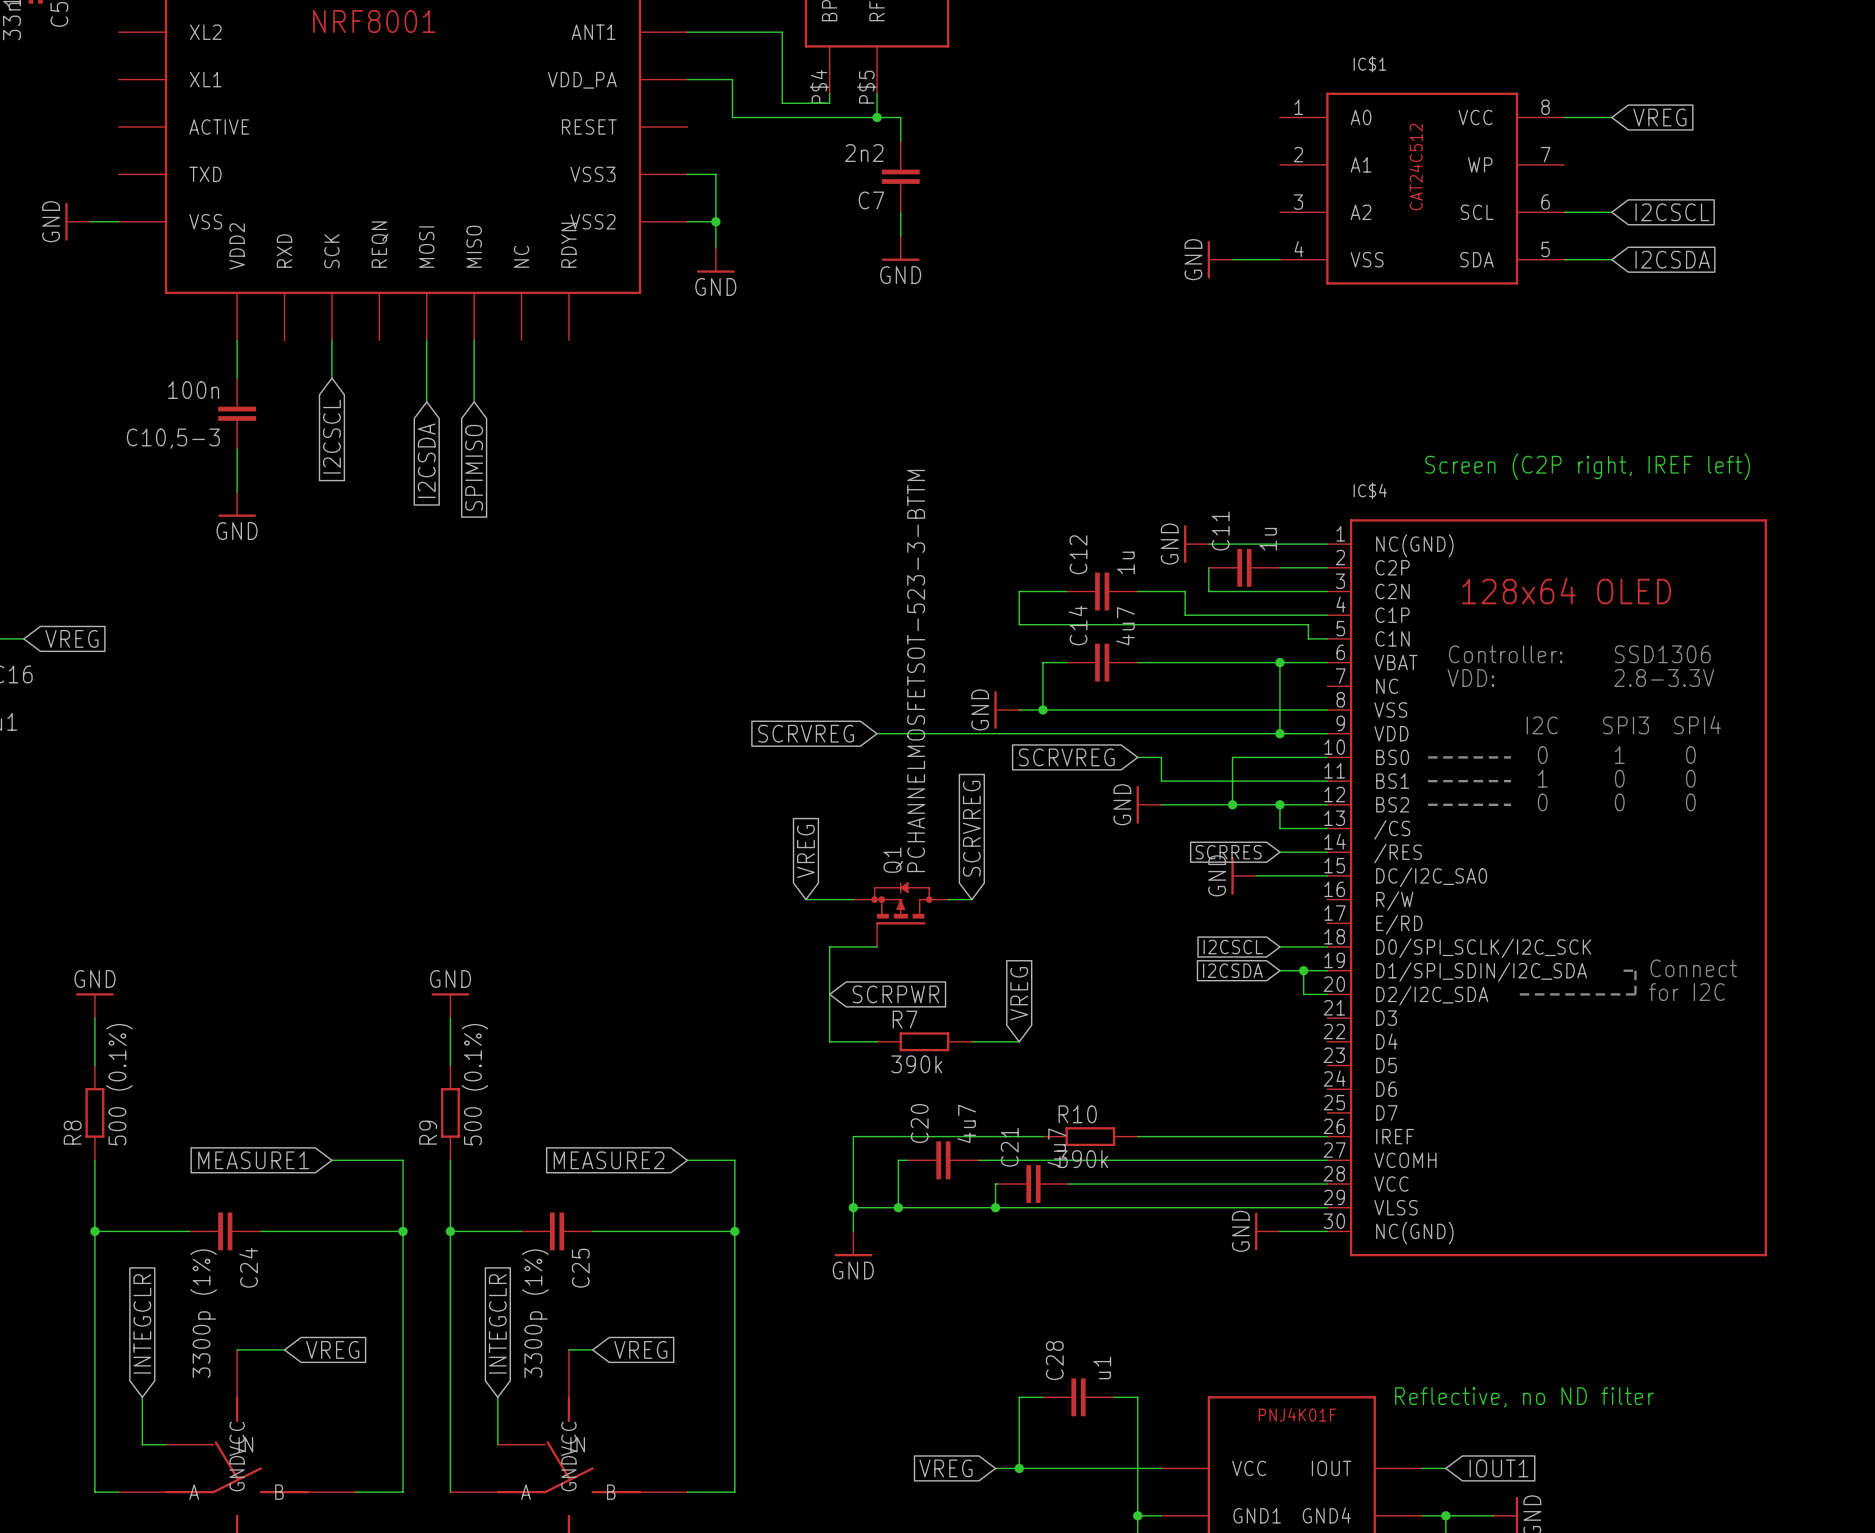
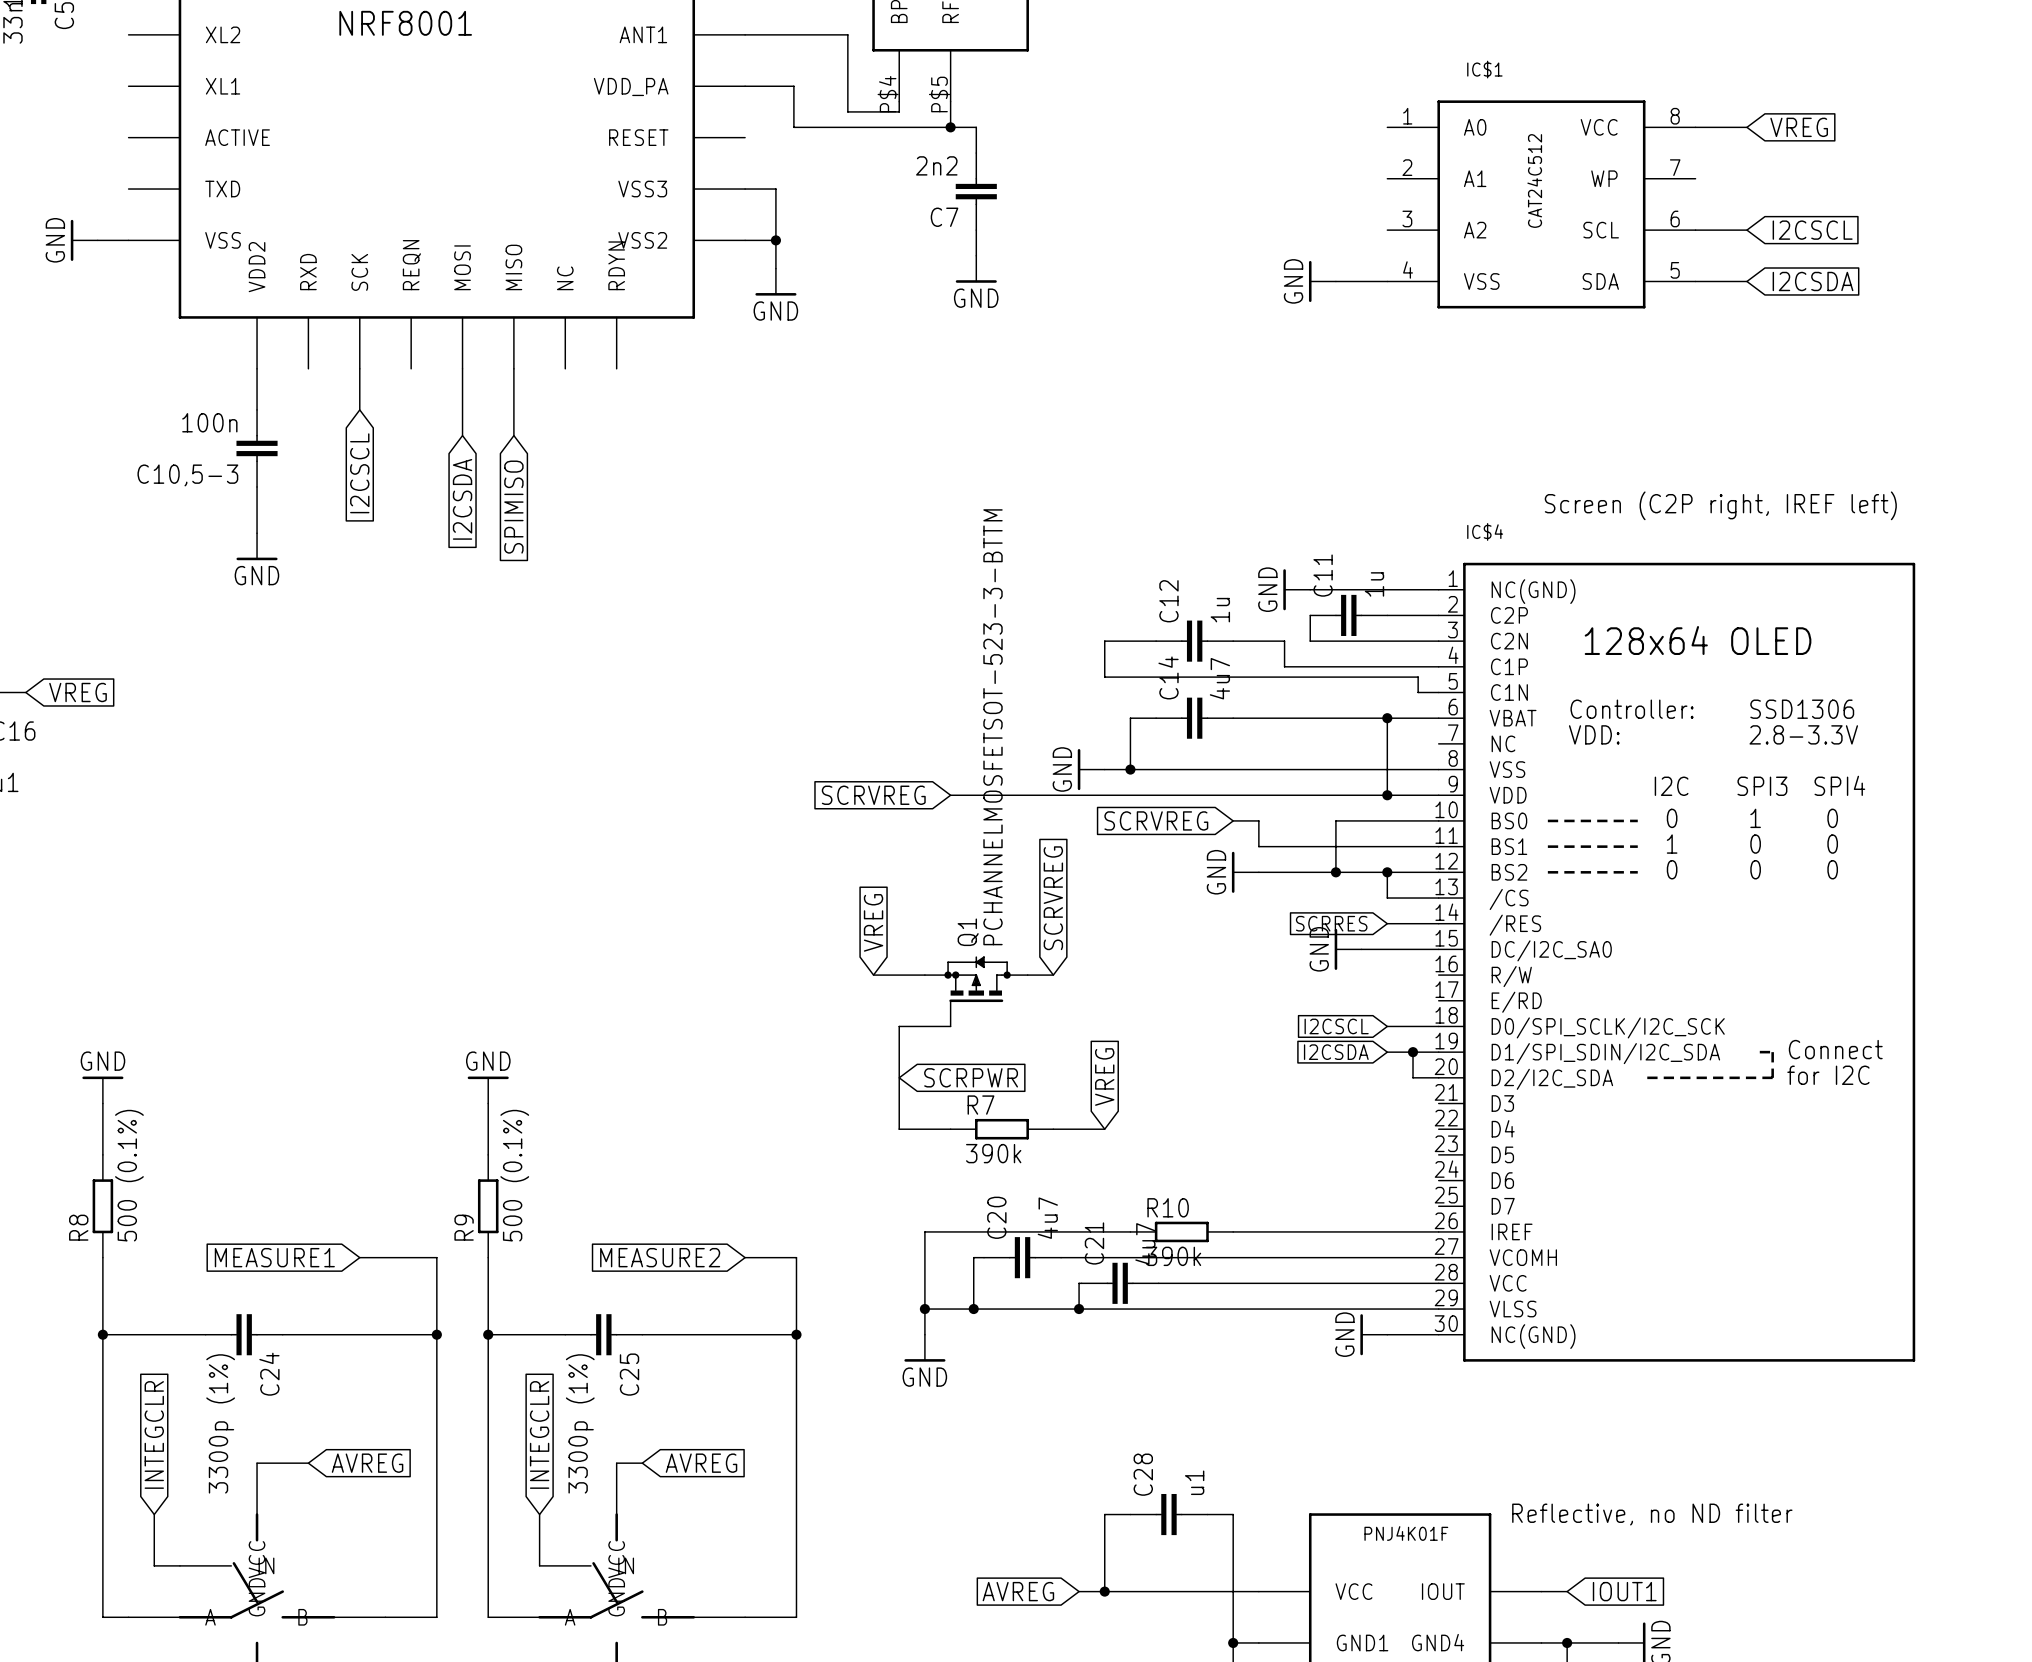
global label: VREG (332, 1349) -> AVREG (367, 1463)
global label: VREG (640, 1349) -> AVREG (701, 1463)
global label: VREG (945, 1468) -> AVREG (1018, 1591)

